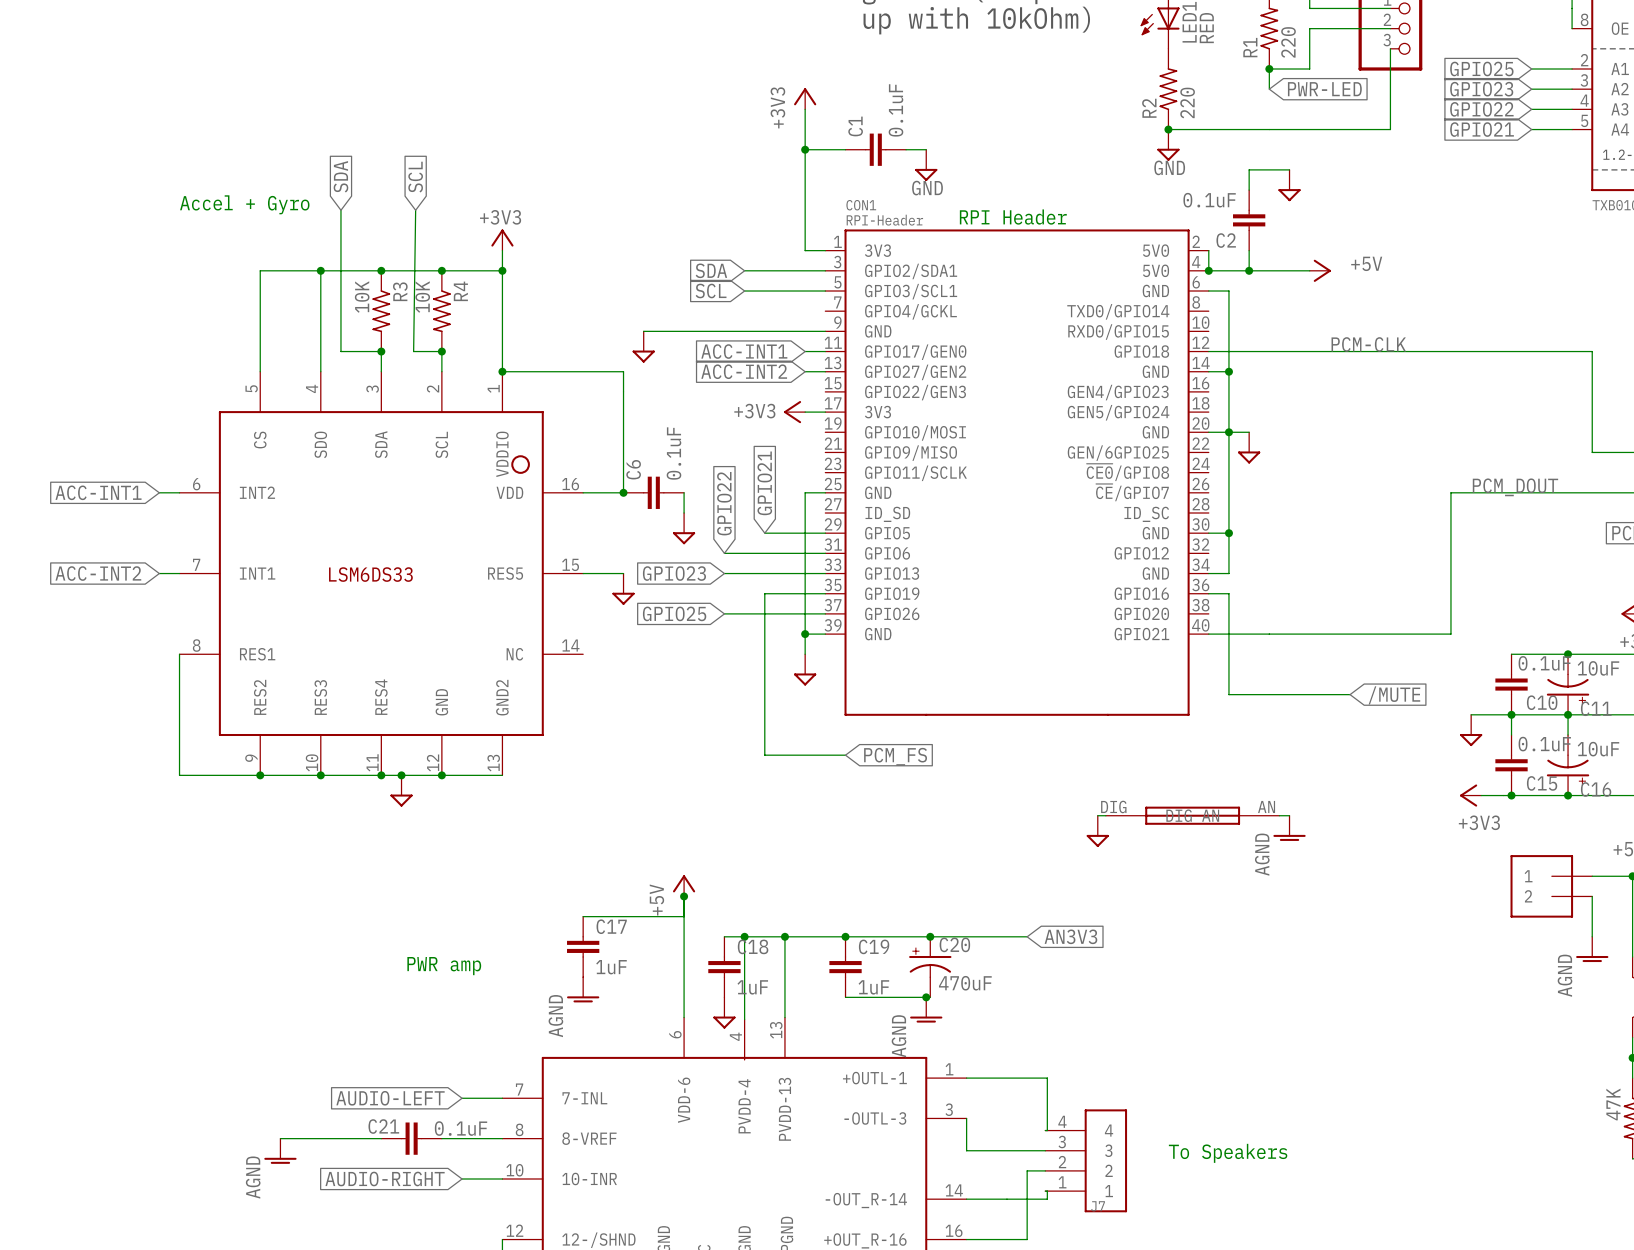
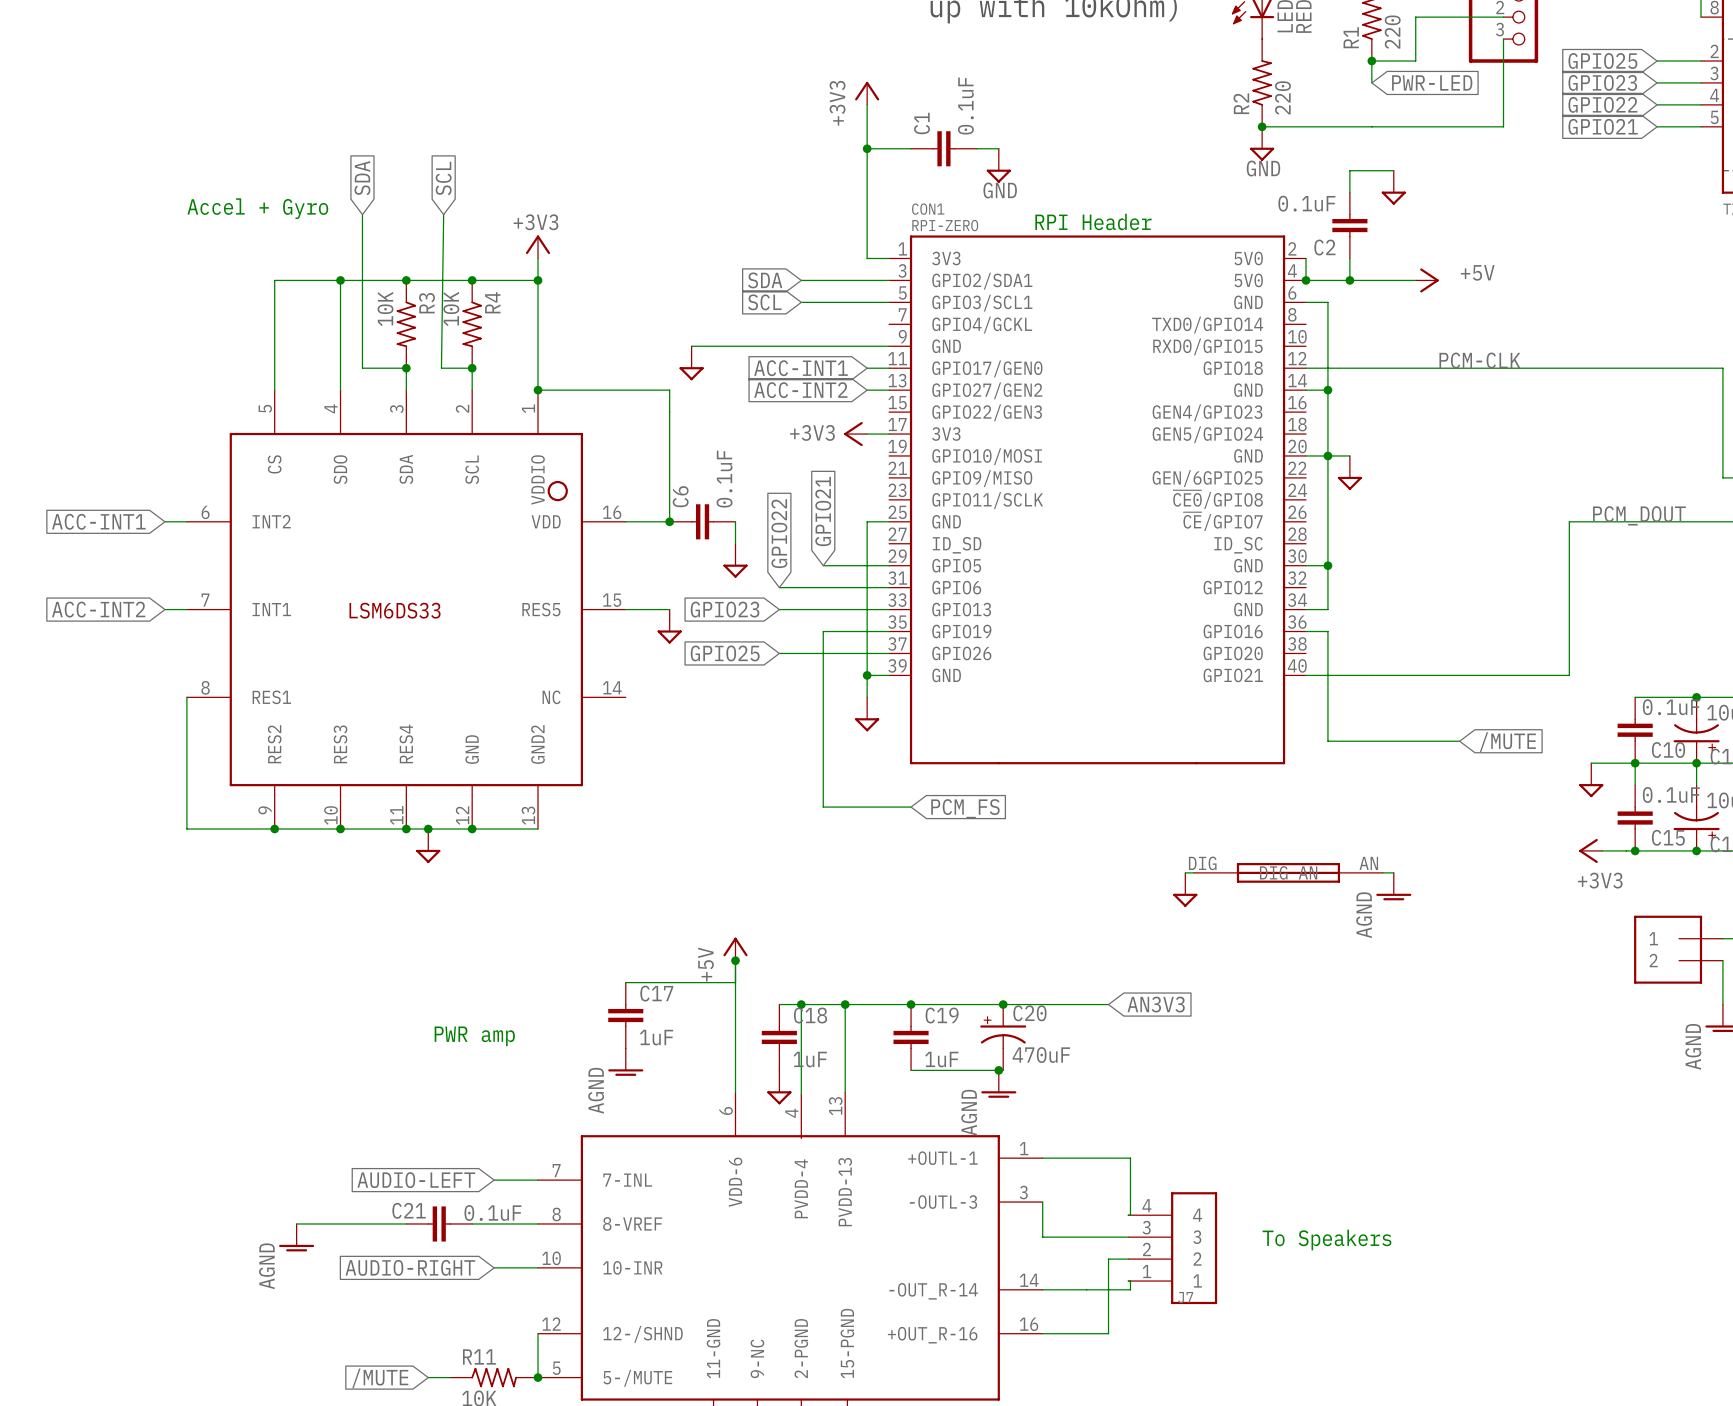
CON1 value: RPI-Header (884, 220) -> RPI-ZERO (945, 225)

